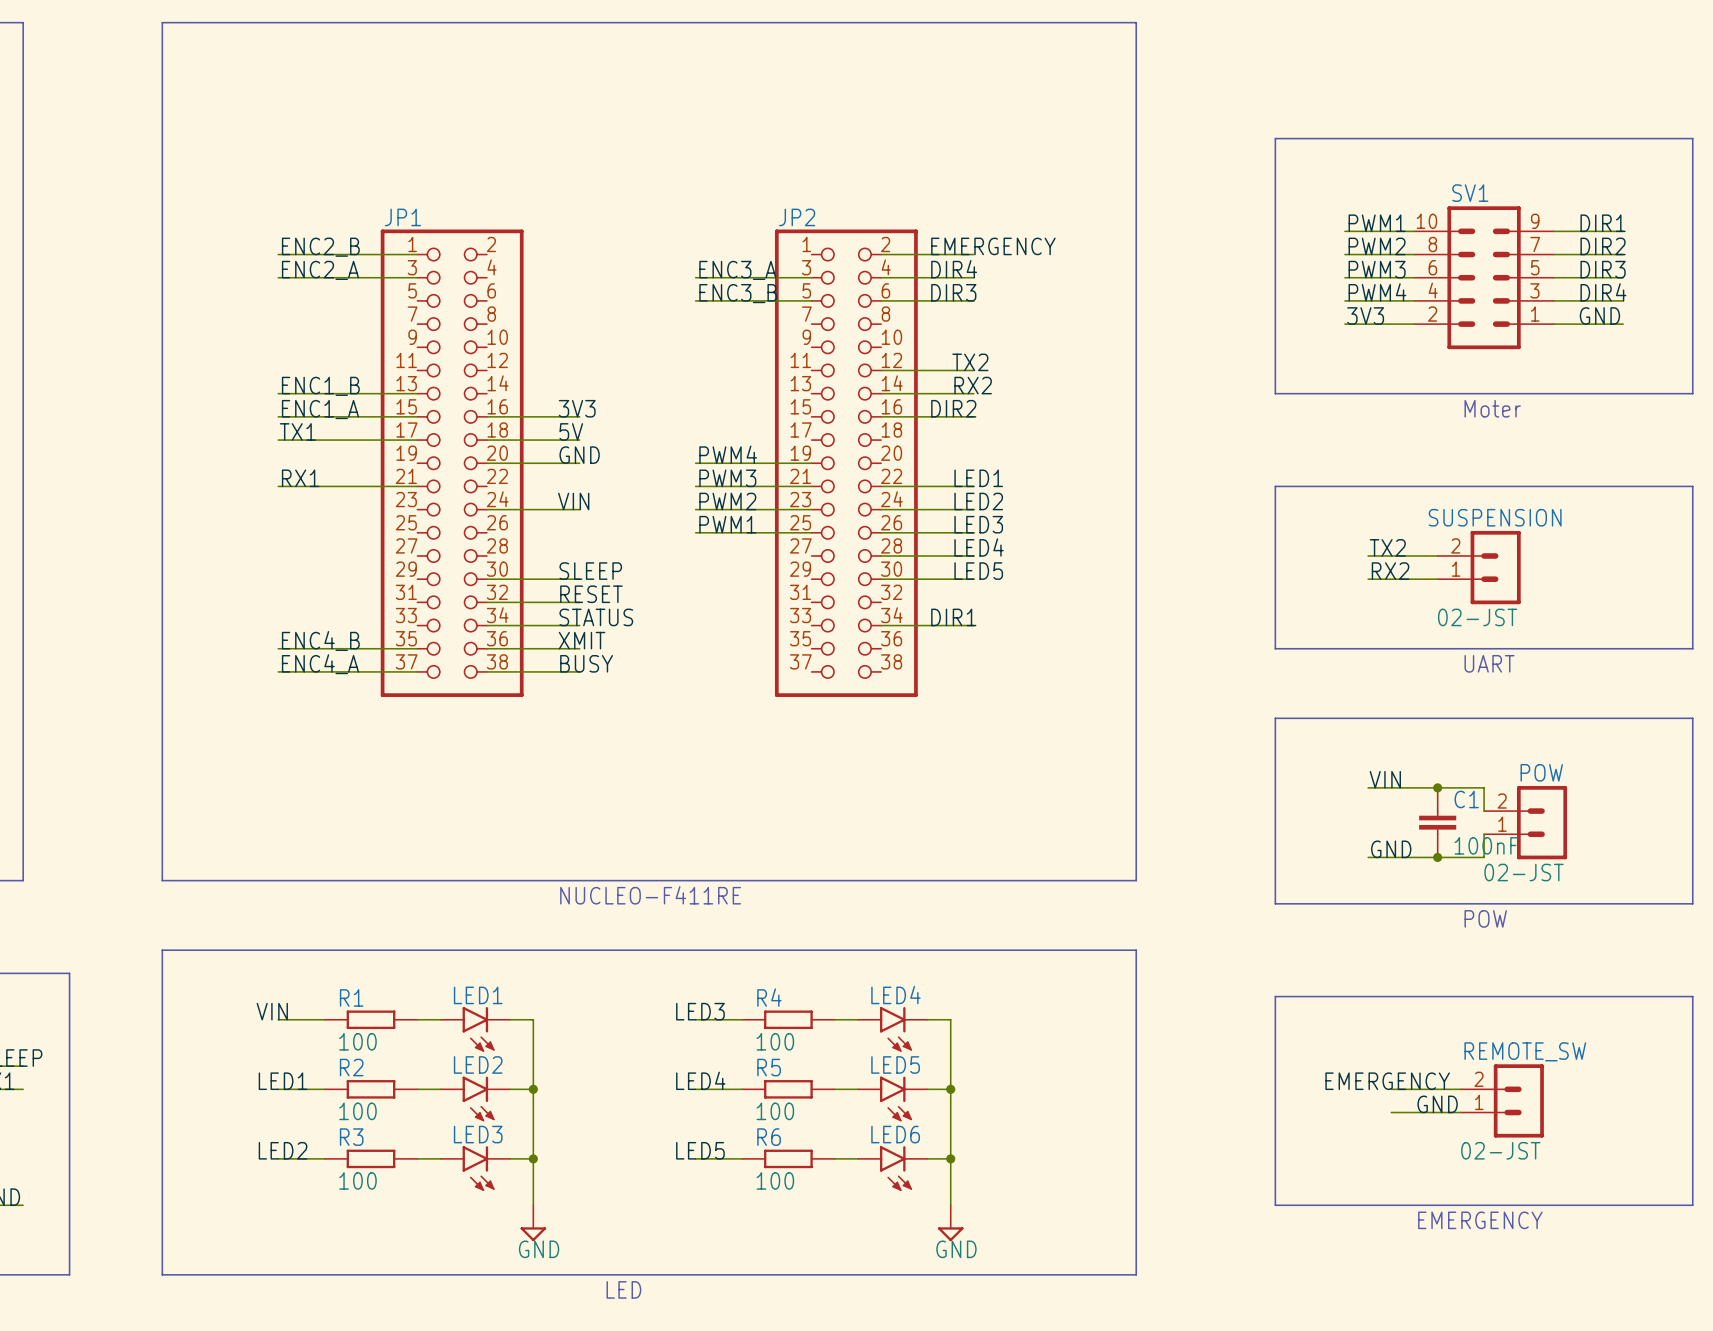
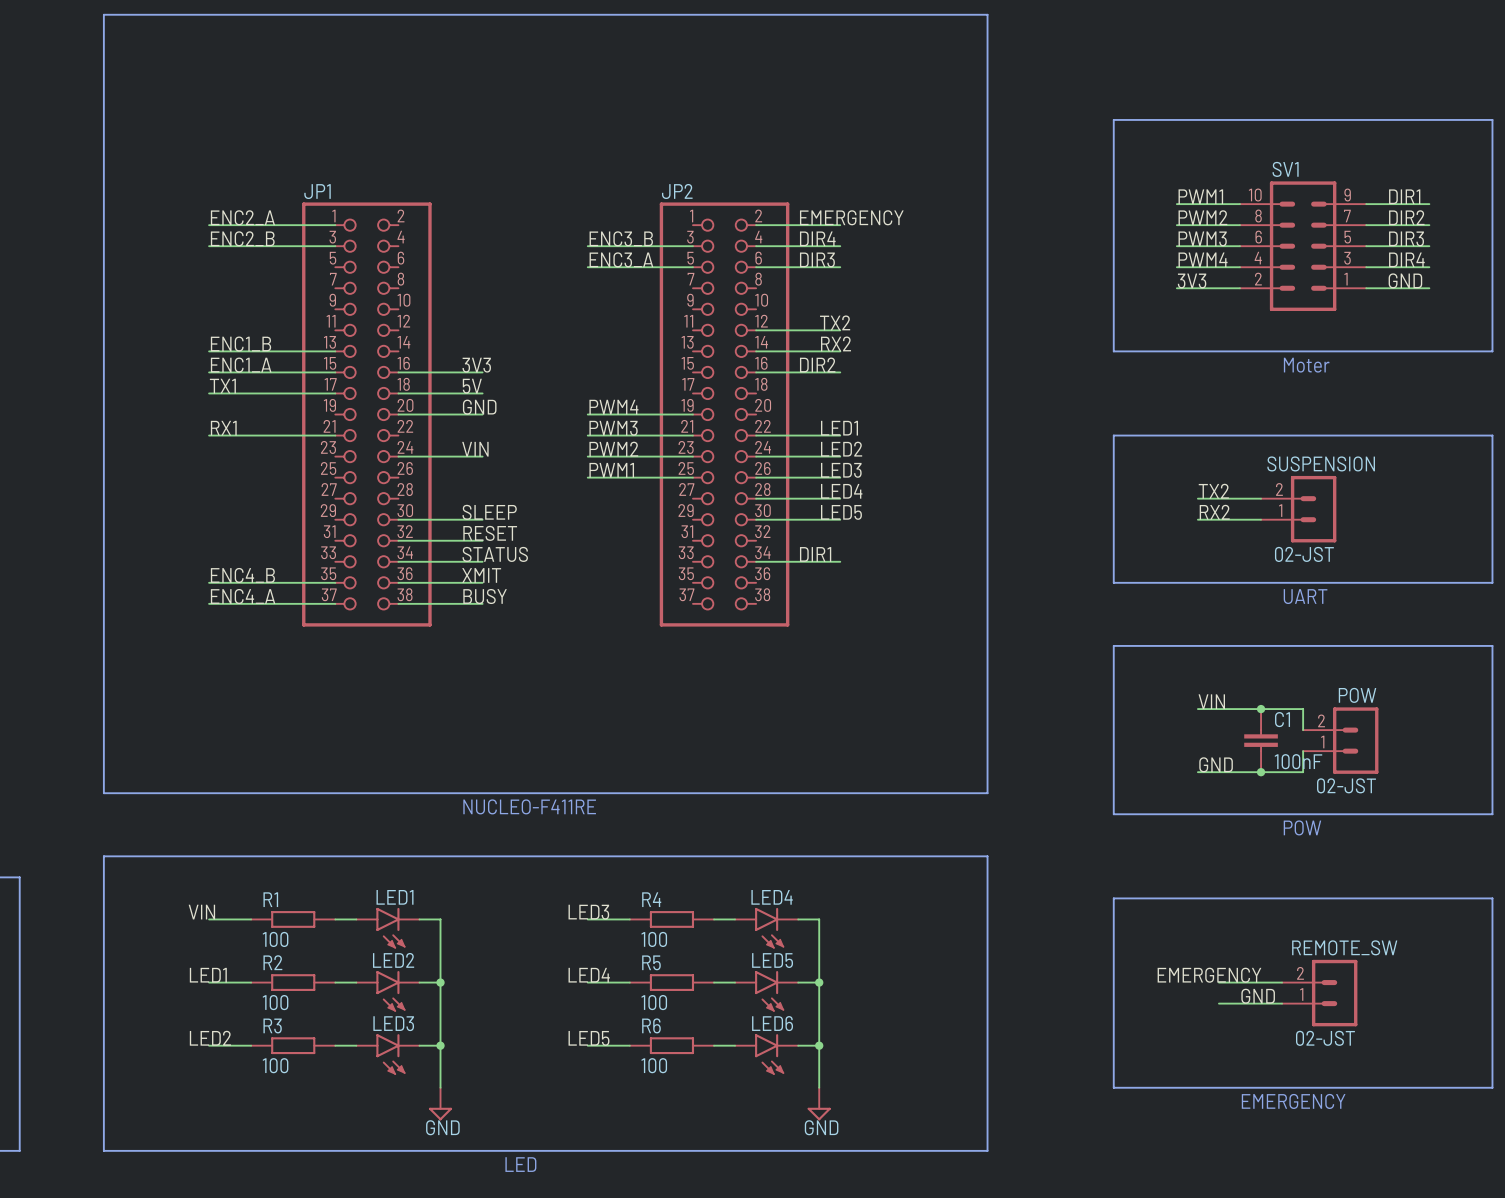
label: ENC2_B (320, 247) -> ENC2_A (242, 217)
label: ENC2_A (320, 270) -> ENC2_B (242, 238)
label: ENC3_A (737, 270) -> ENC3_B (621, 238)
label: ENC3_B (738, 293) -> ENC3_A (621, 259)

